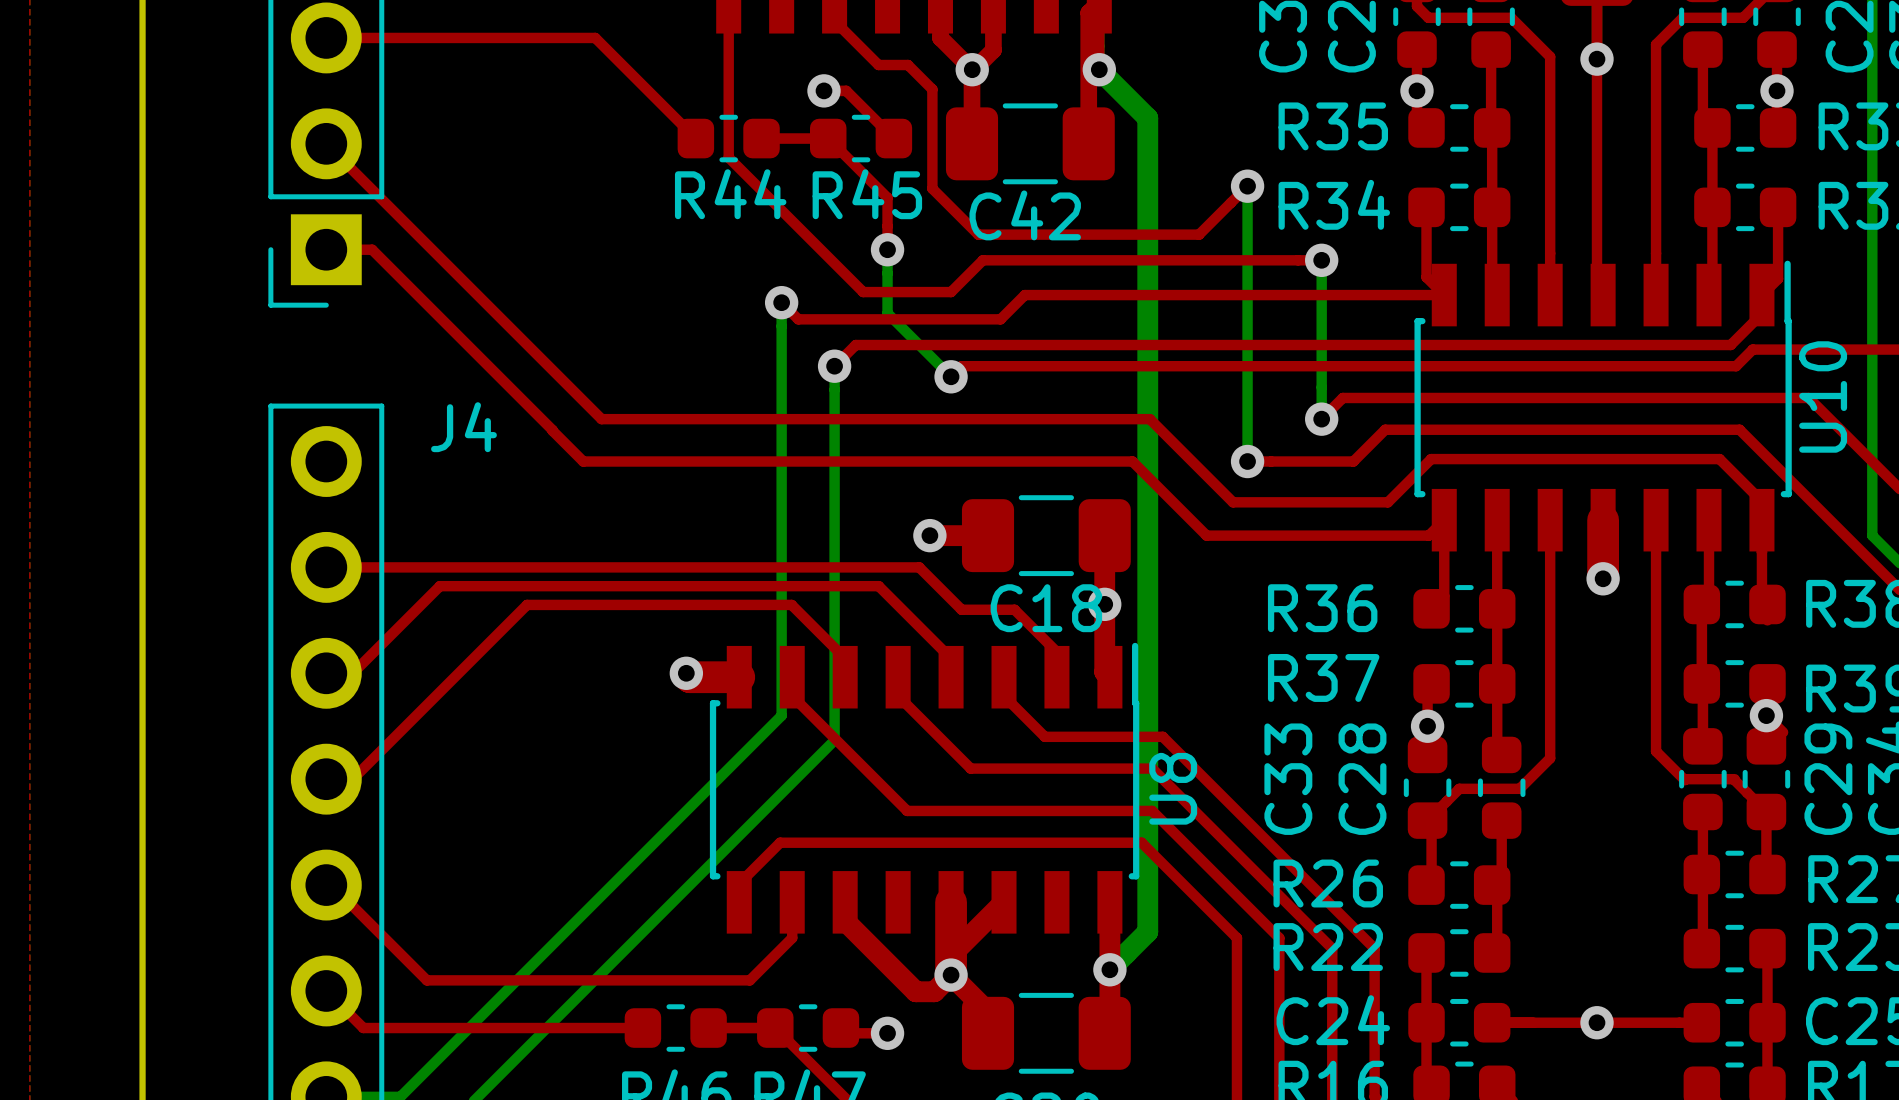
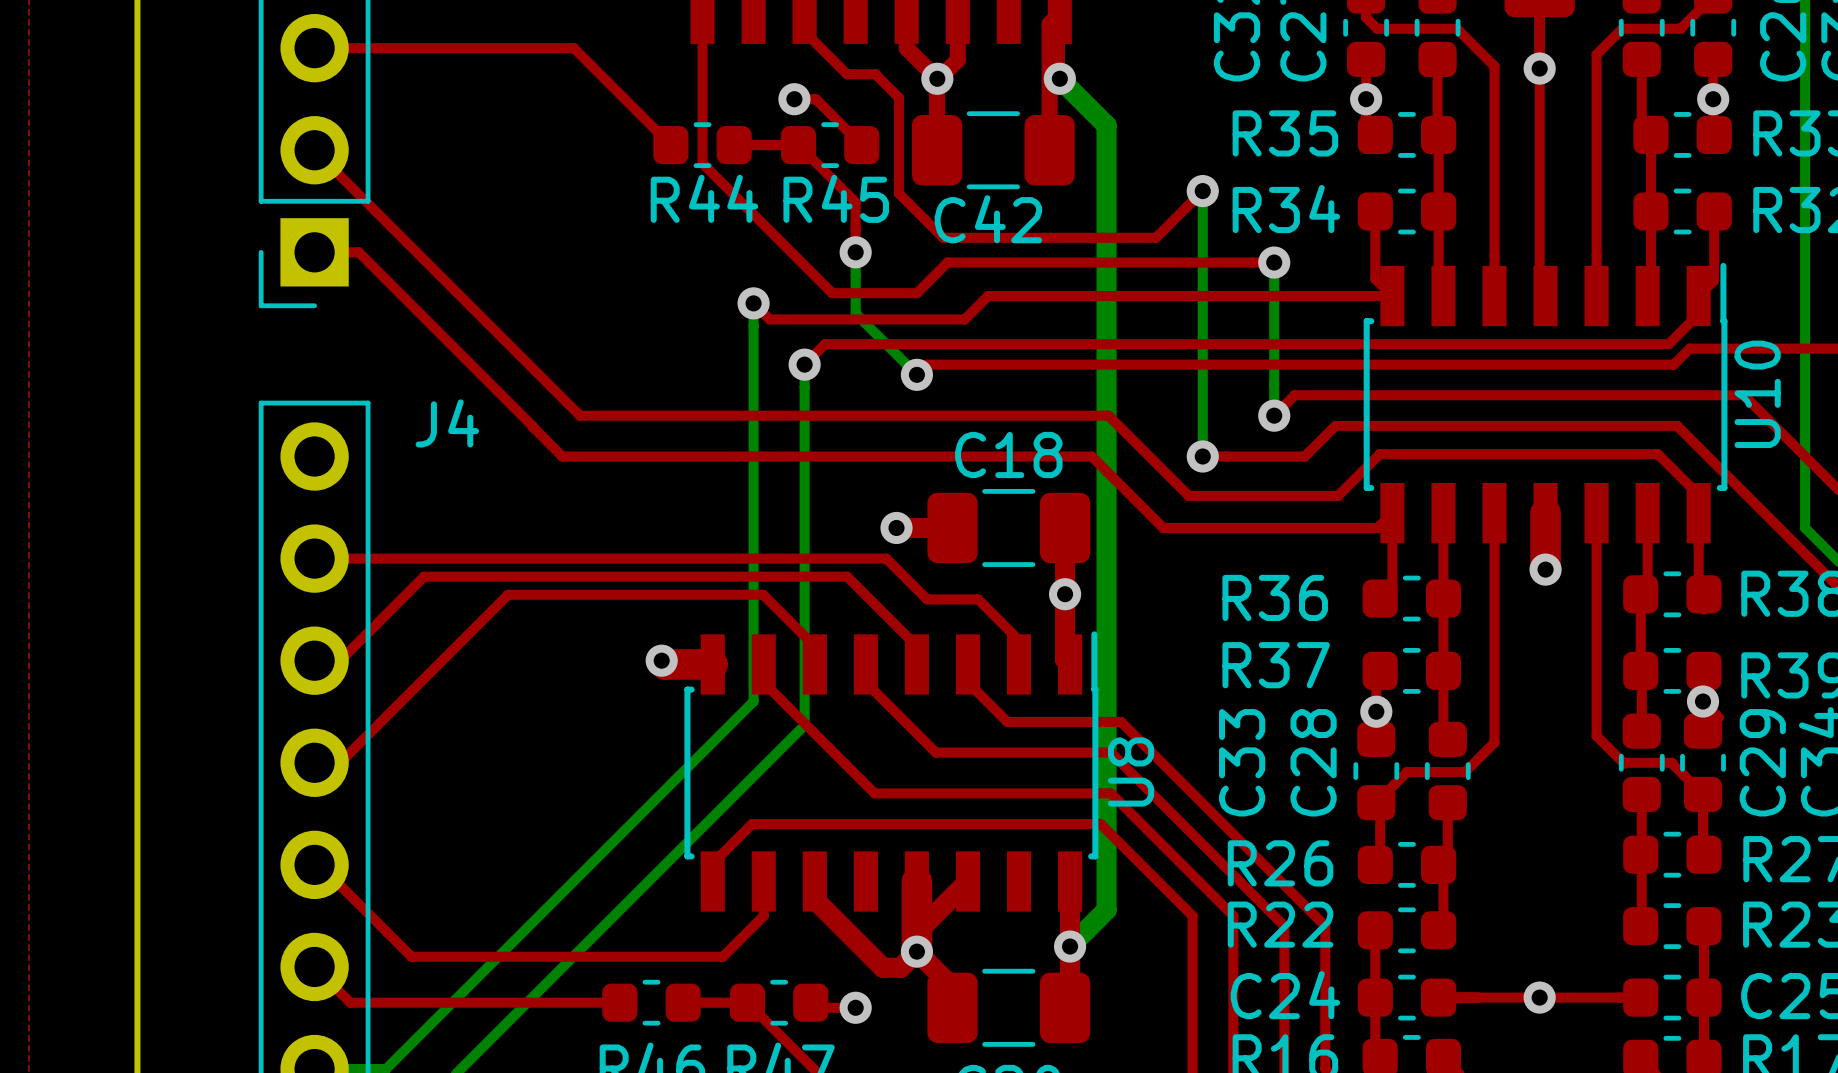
C18 name position: C18 (1046, 608) -> C18 (1008, 455)

